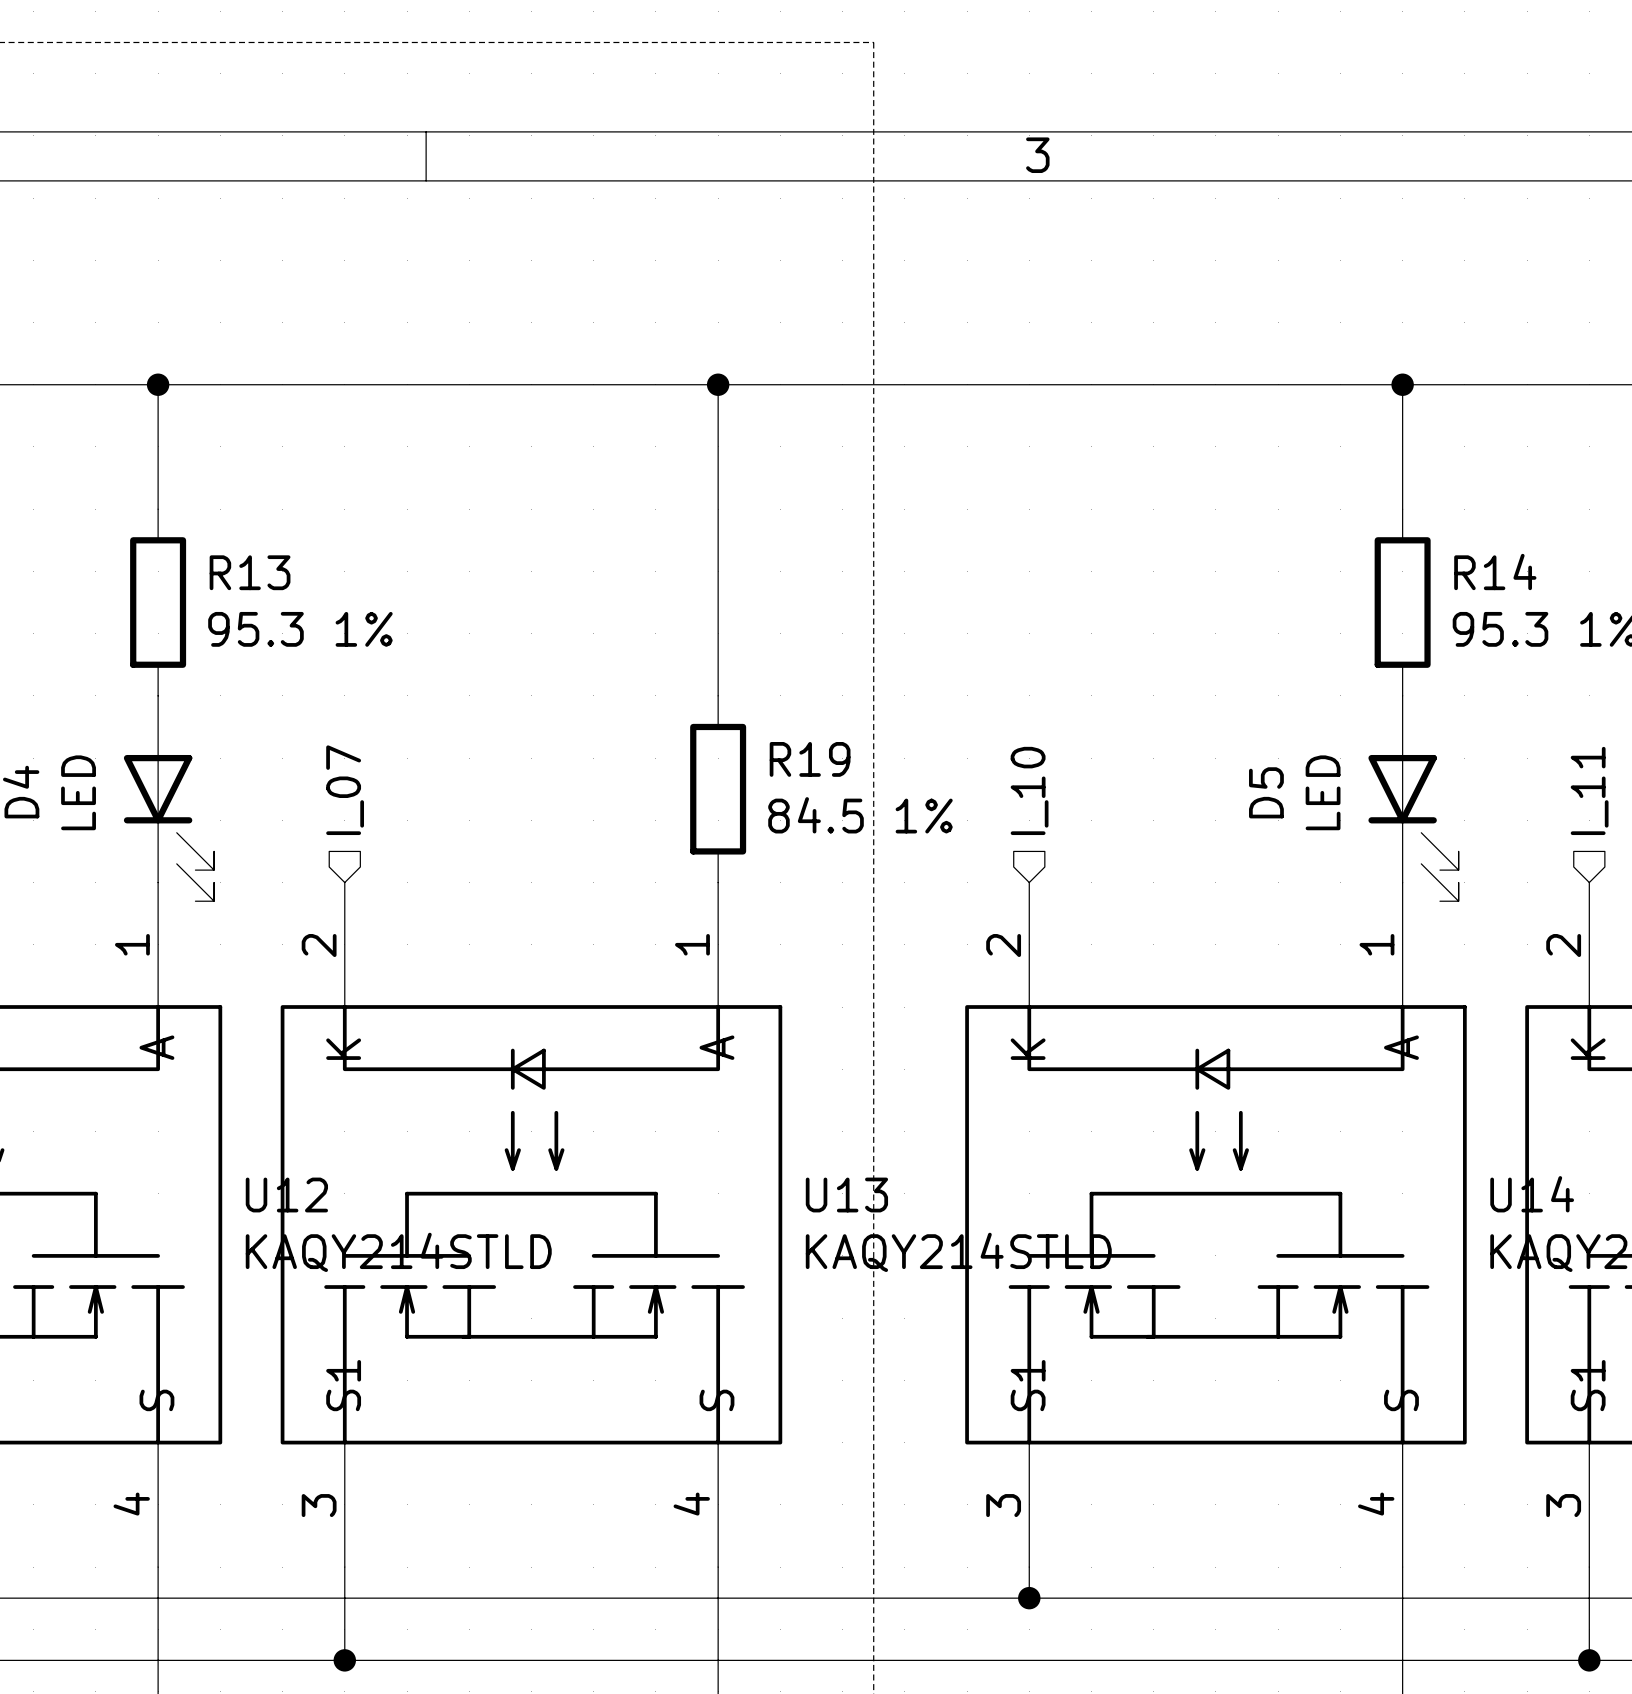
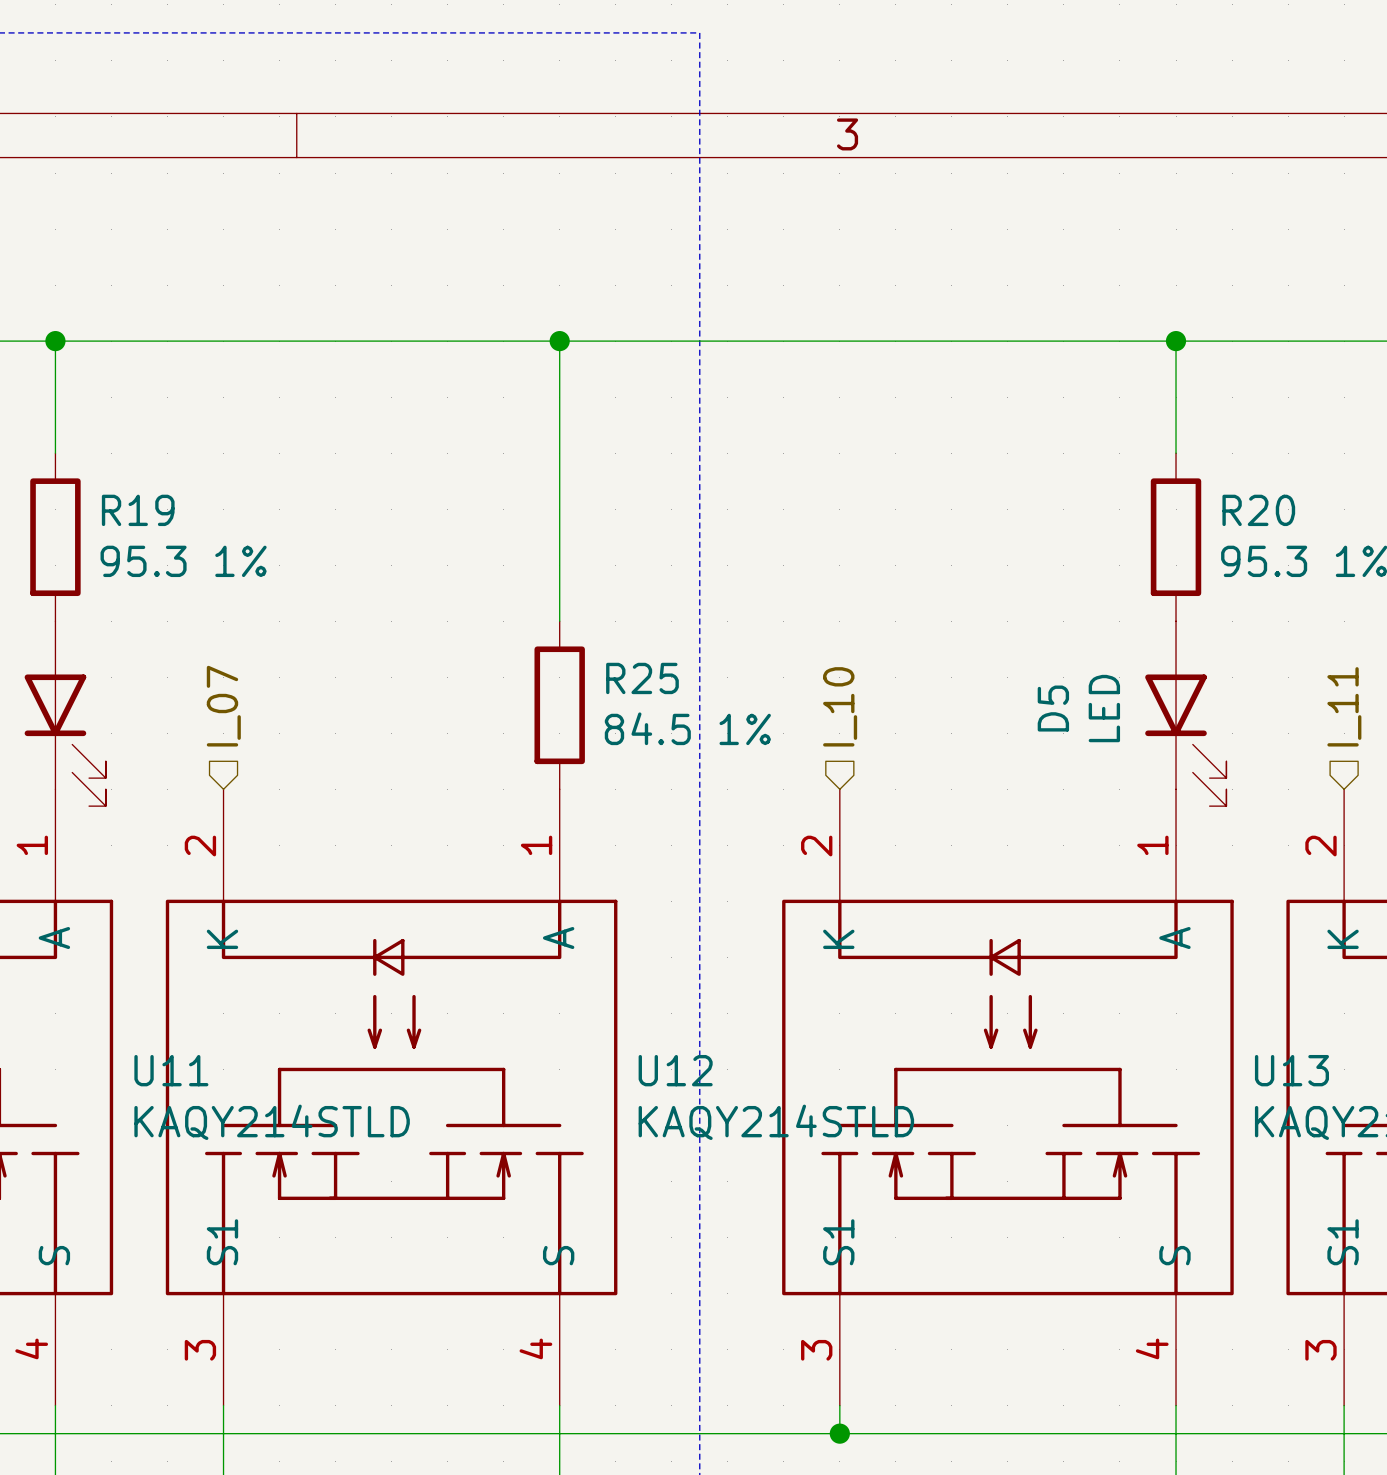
R13 name: R13 (250, 572) -> R19 (138, 510)
R14 name: R14 (1495, 572) -> R20 (1258, 510)
R19 name: R19 (810, 759) -> R25 (642, 678)
U14 name: U14 (1532, 1194) -> U13 (1291, 1070)
U12 name: U12 (286, 1195) -> U11 (171, 1070)
U13 name: U13 (846, 1195) -> U12 (675, 1070)

